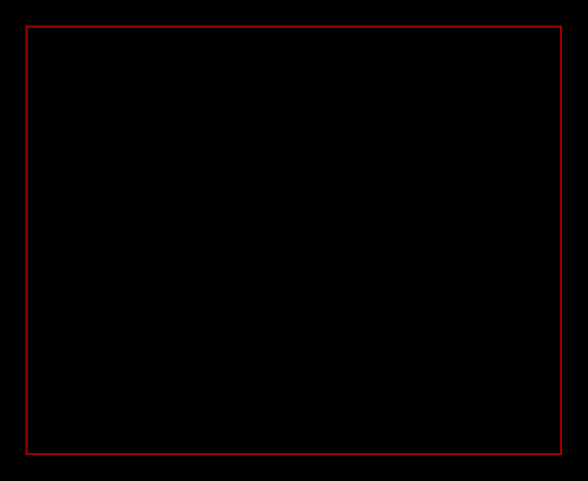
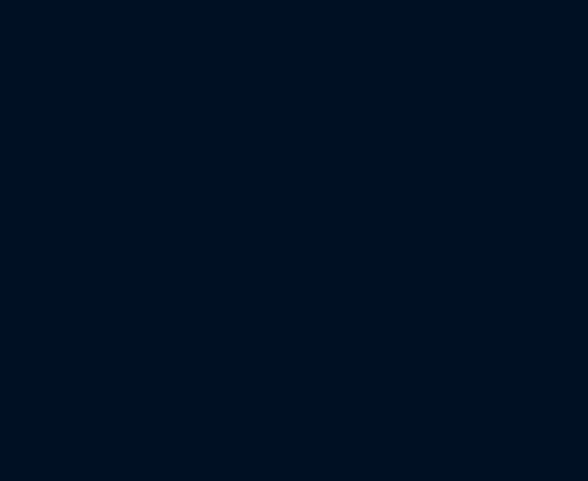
top track: (560, 26) (26, 26) (26, 454) (560, 454) (560, 26) -> none

